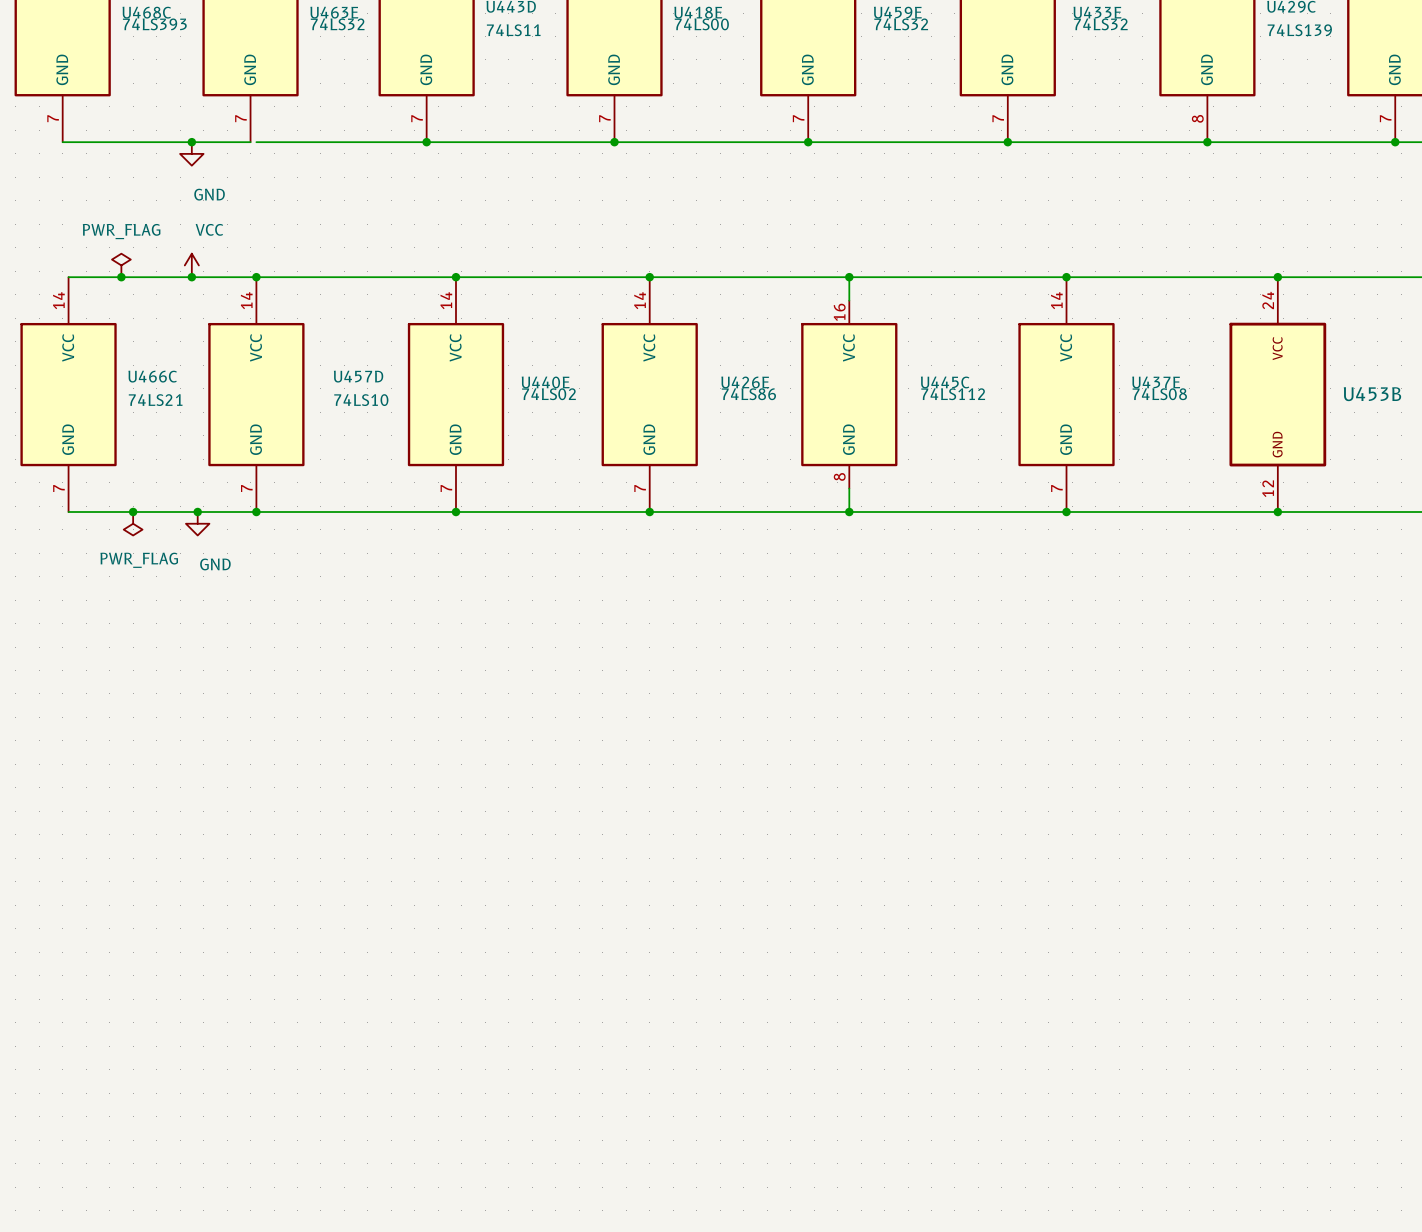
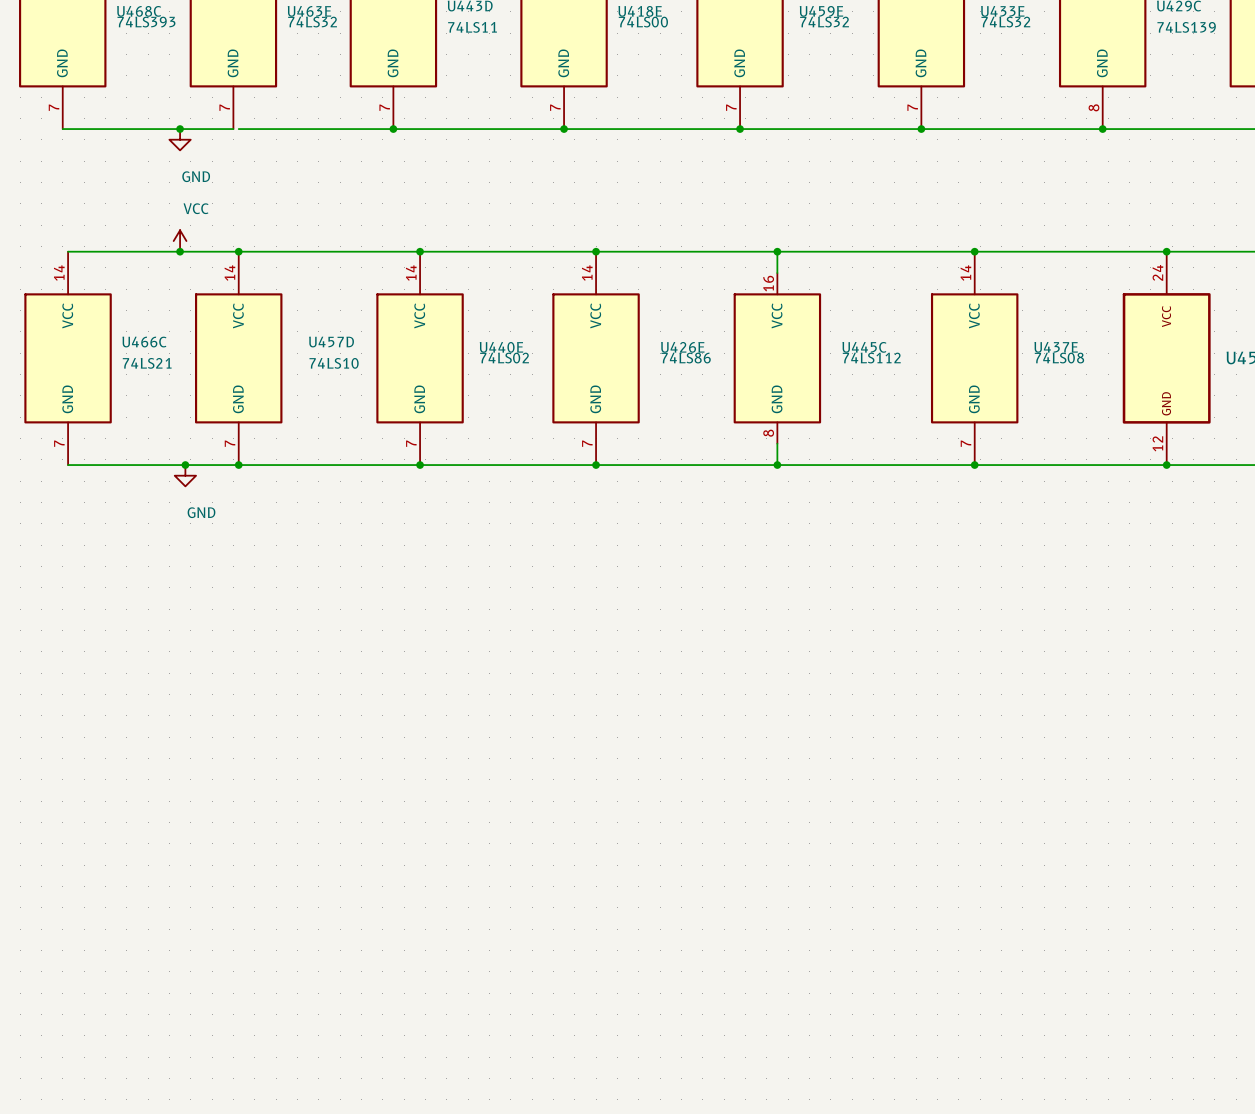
power symbol: PWR_FLAG (121, 265) -> none
junction: (121, 277) -> none
junction: (133, 512) -> none
power symbol: PWR_FLAG (133, 523) -> none

